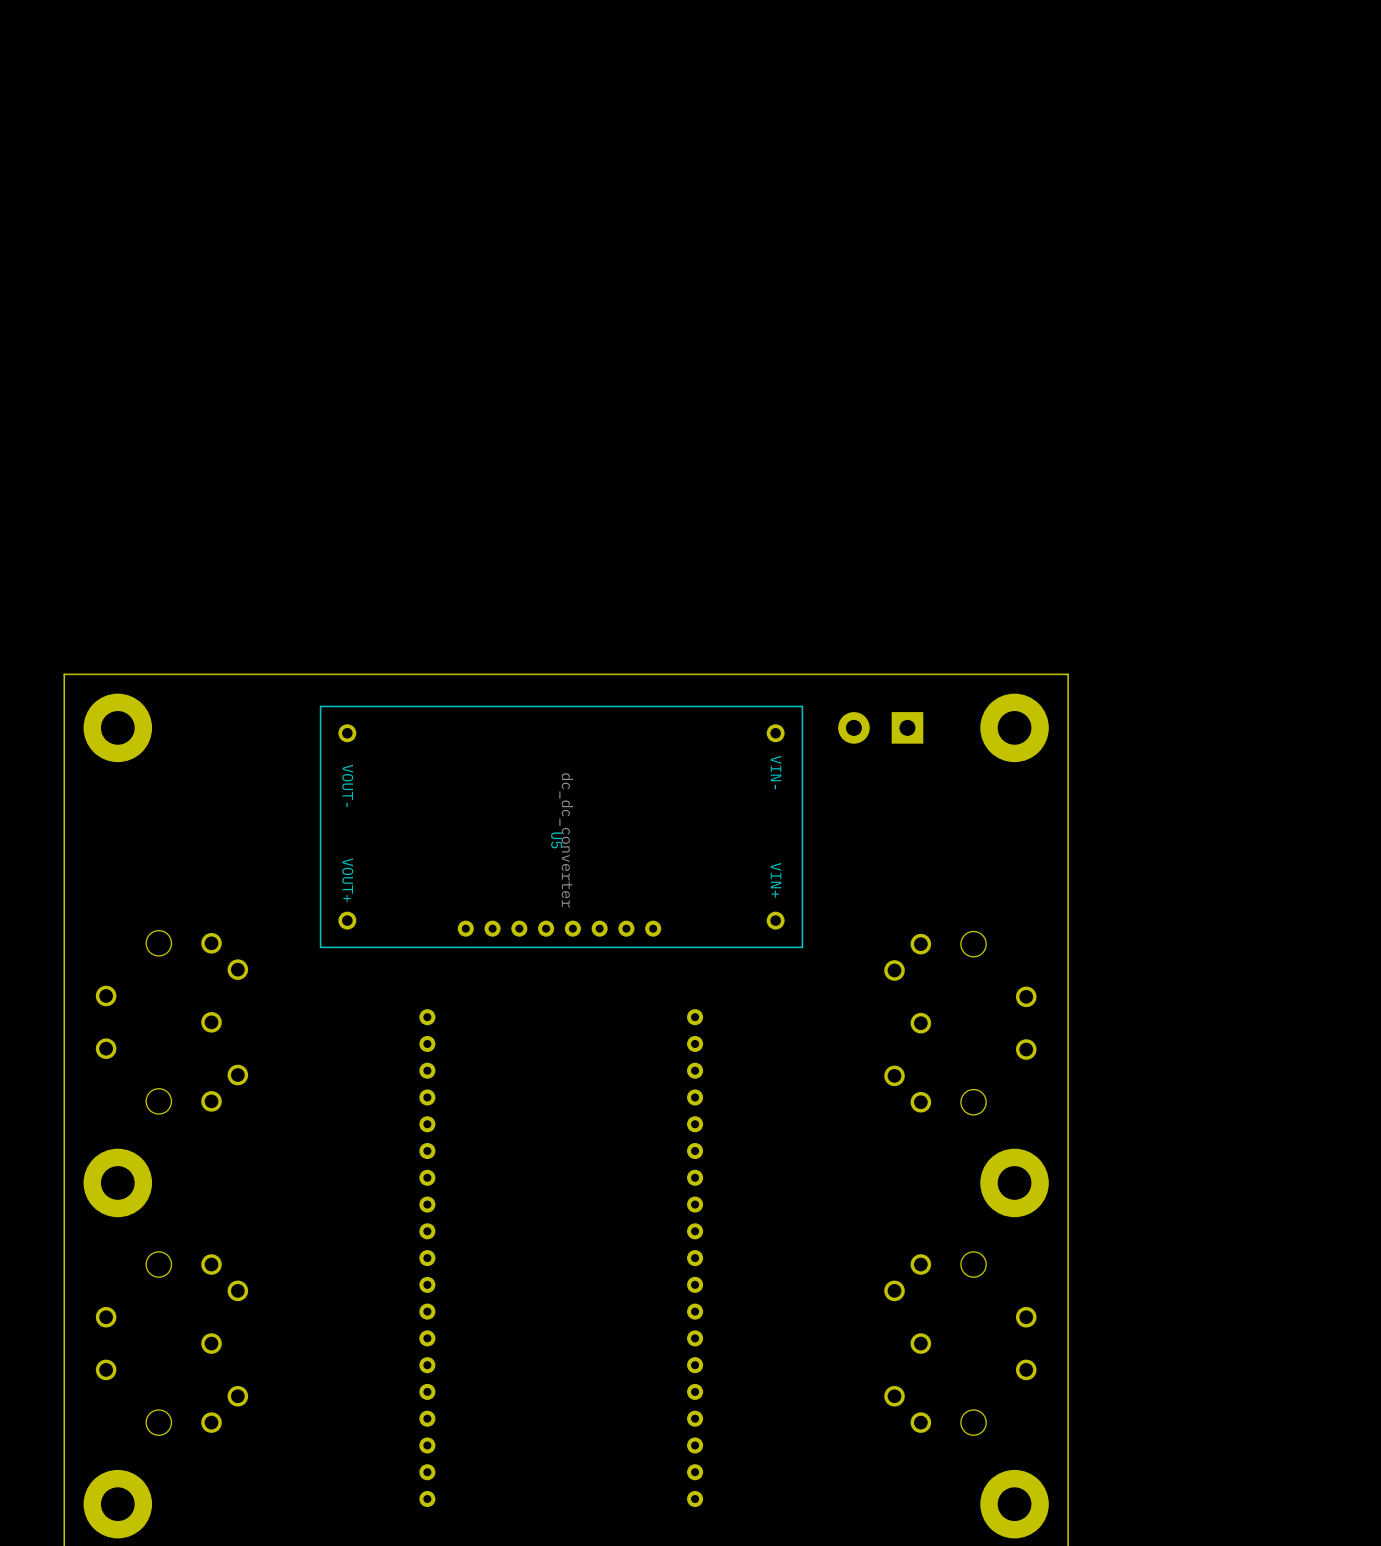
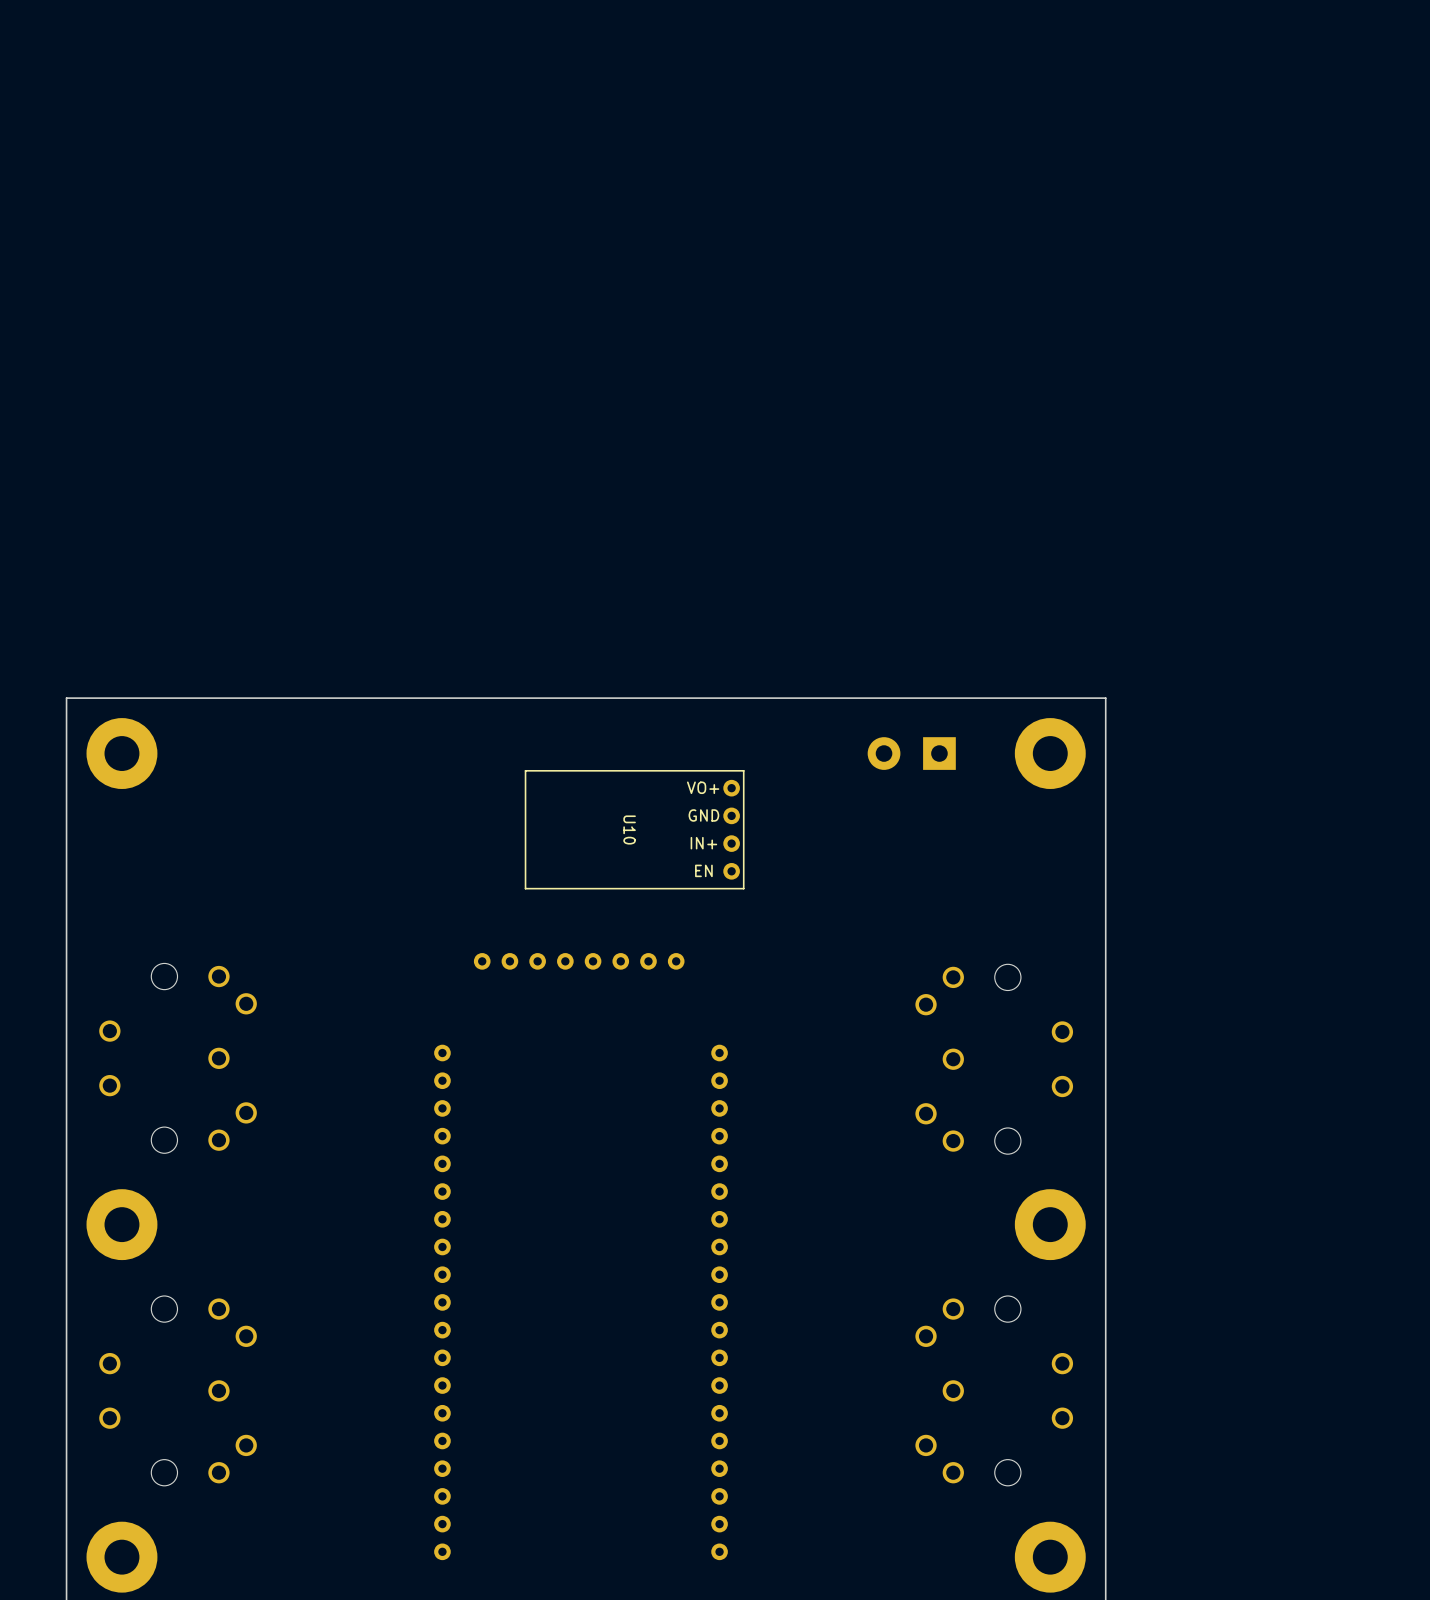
U10: none -> (634, 829)
U5: dc_dc_converter (561, 826) -> none

